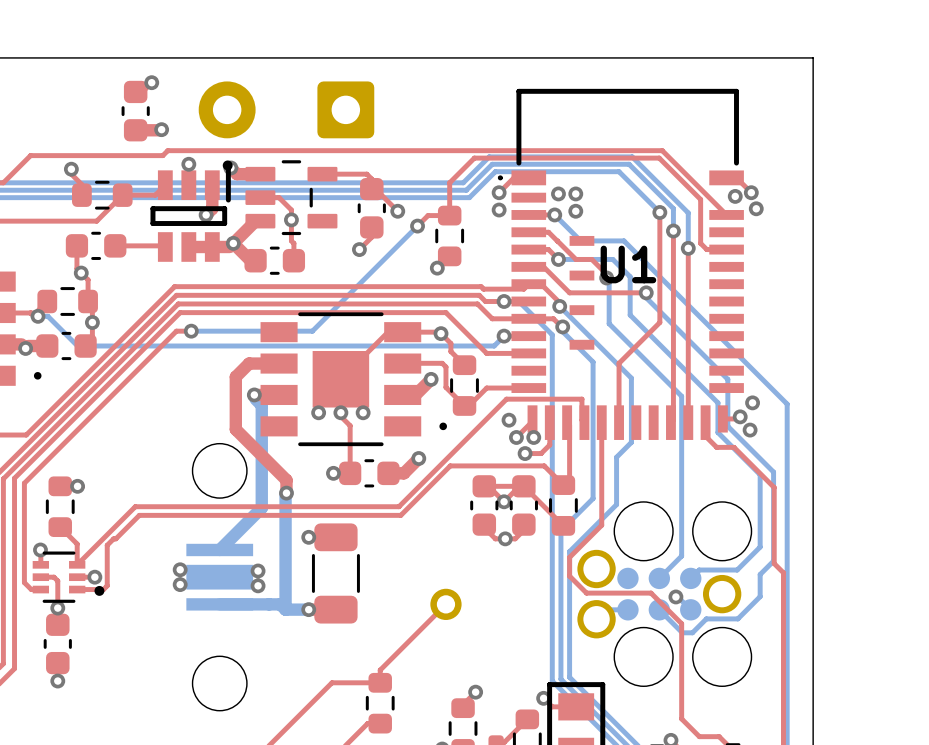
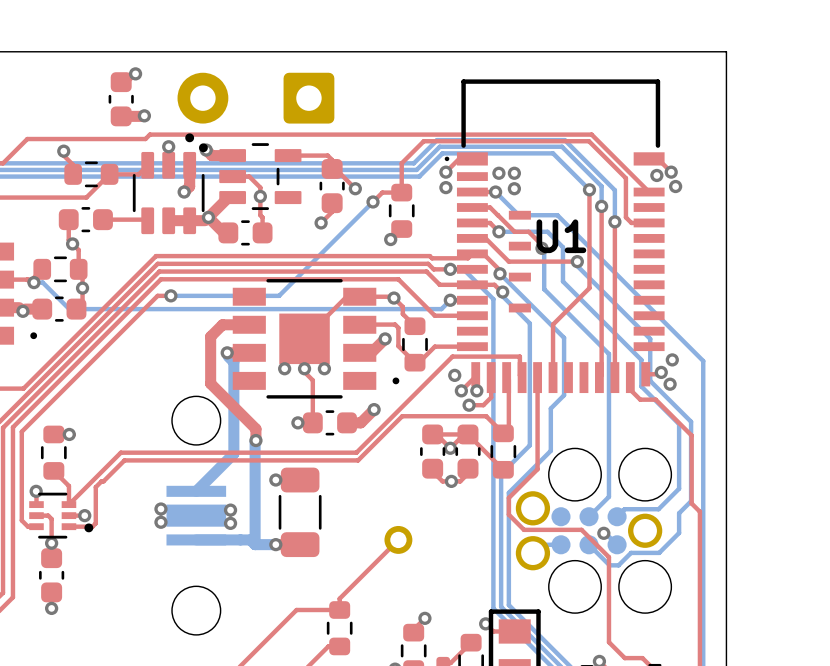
part footprint: [150, 167, 231, 262] -> [132, 133, 205, 235]

